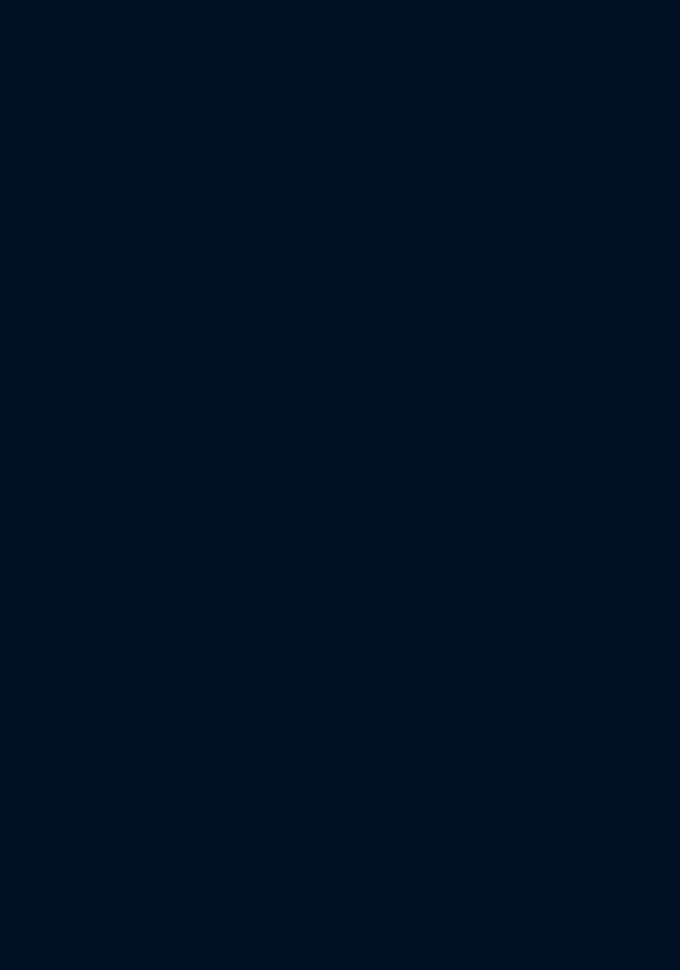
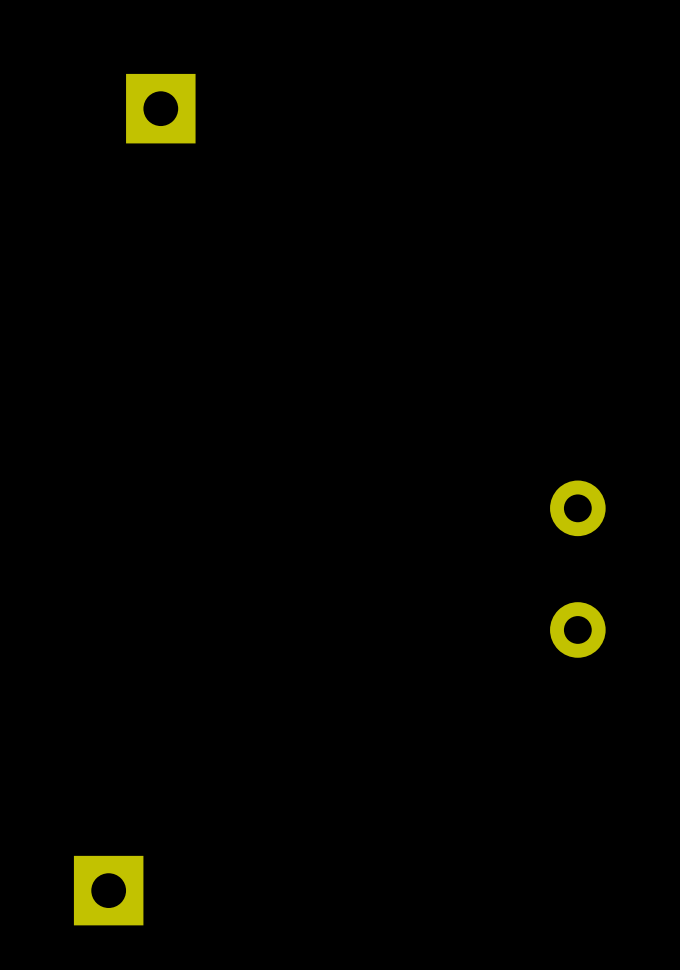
part: none -> (160, 108)
part: none -> (577, 569)
part: none -> (108, 890)

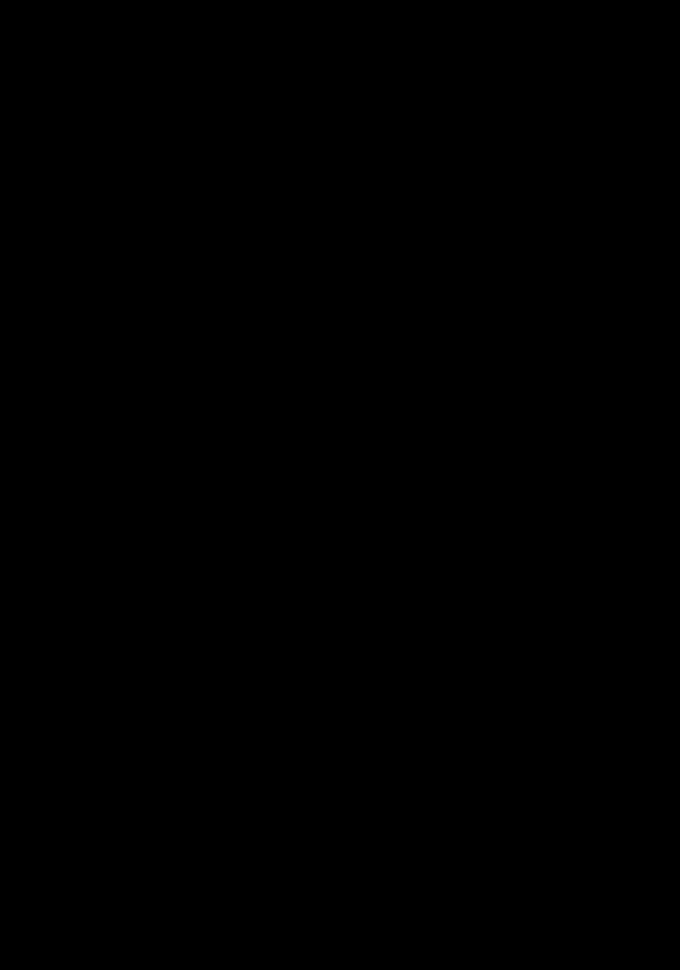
part: (160, 108) -> none
part: (577, 569) -> none
part: (108, 890) -> none

